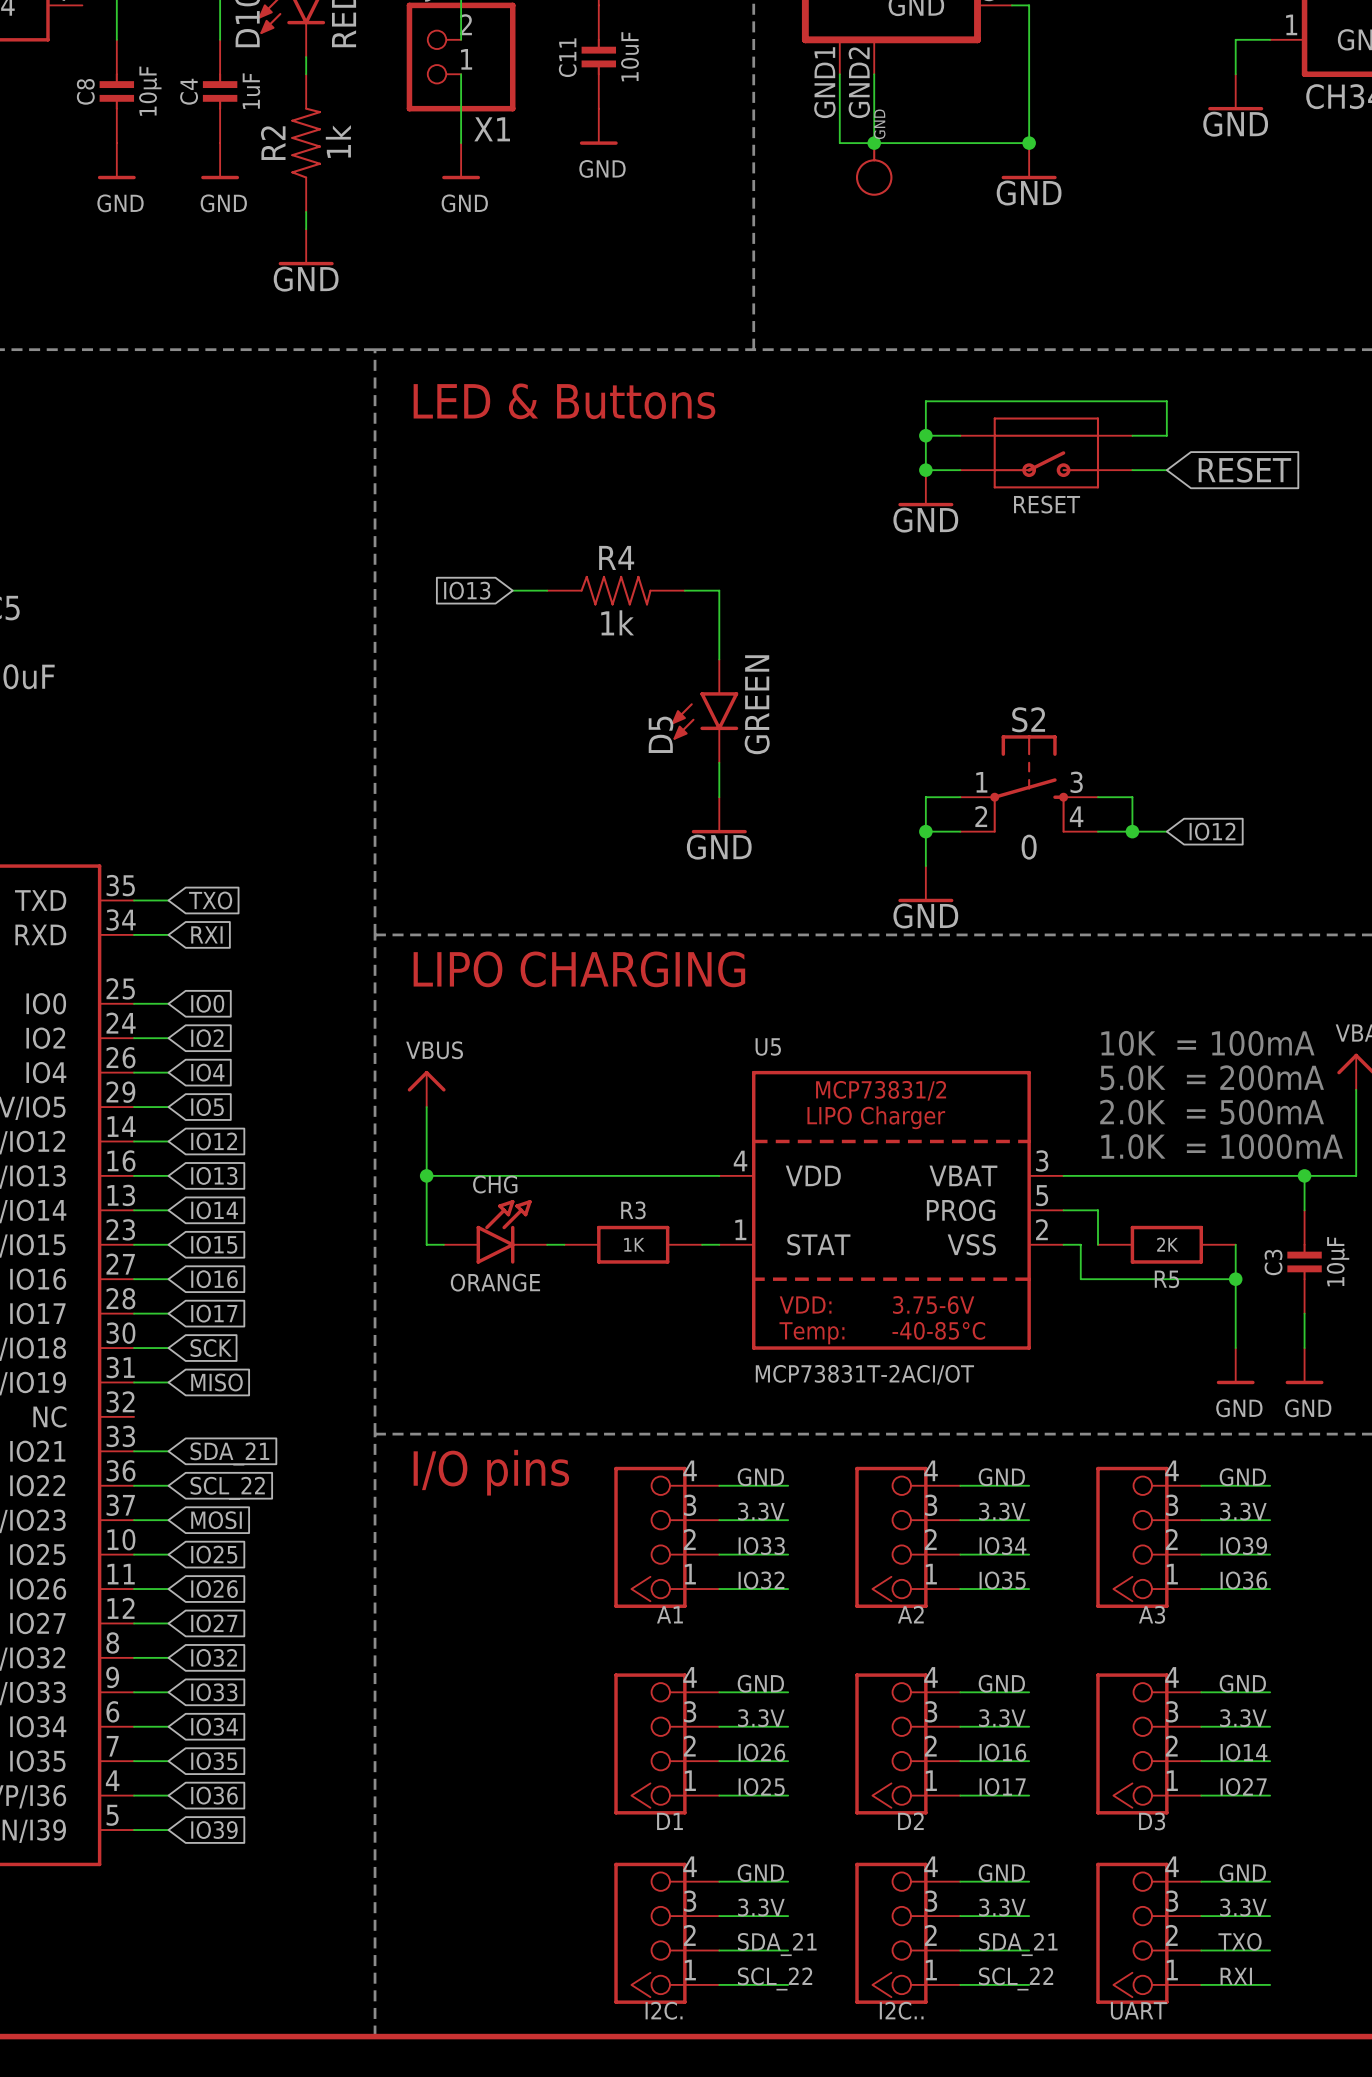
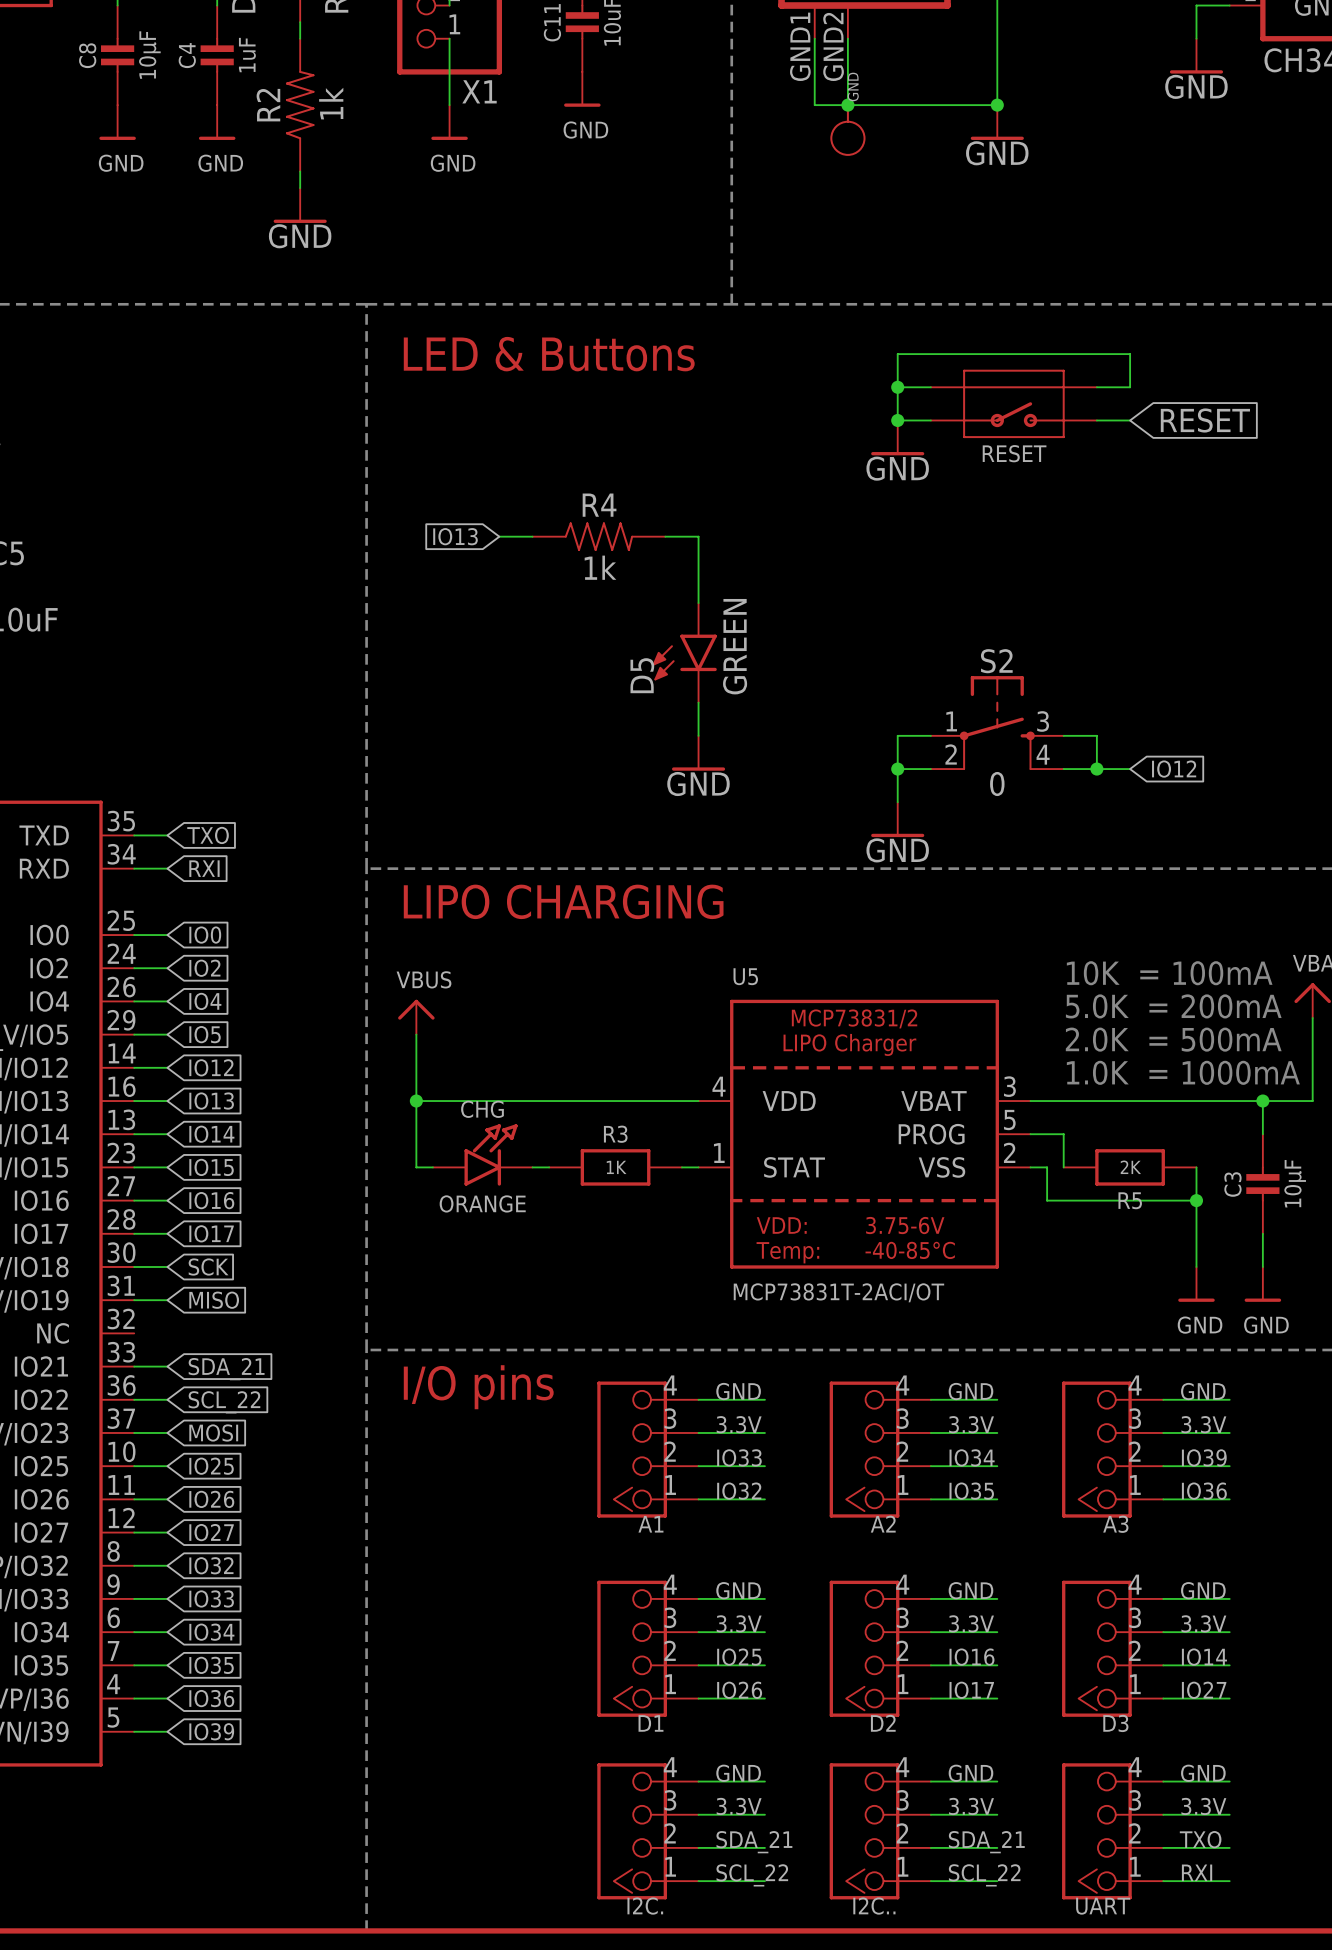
label: IO26 (761, 1752) -> IO25 (739, 1657)
label: IO25 (761, 1787) -> IO26 (739, 1690)

